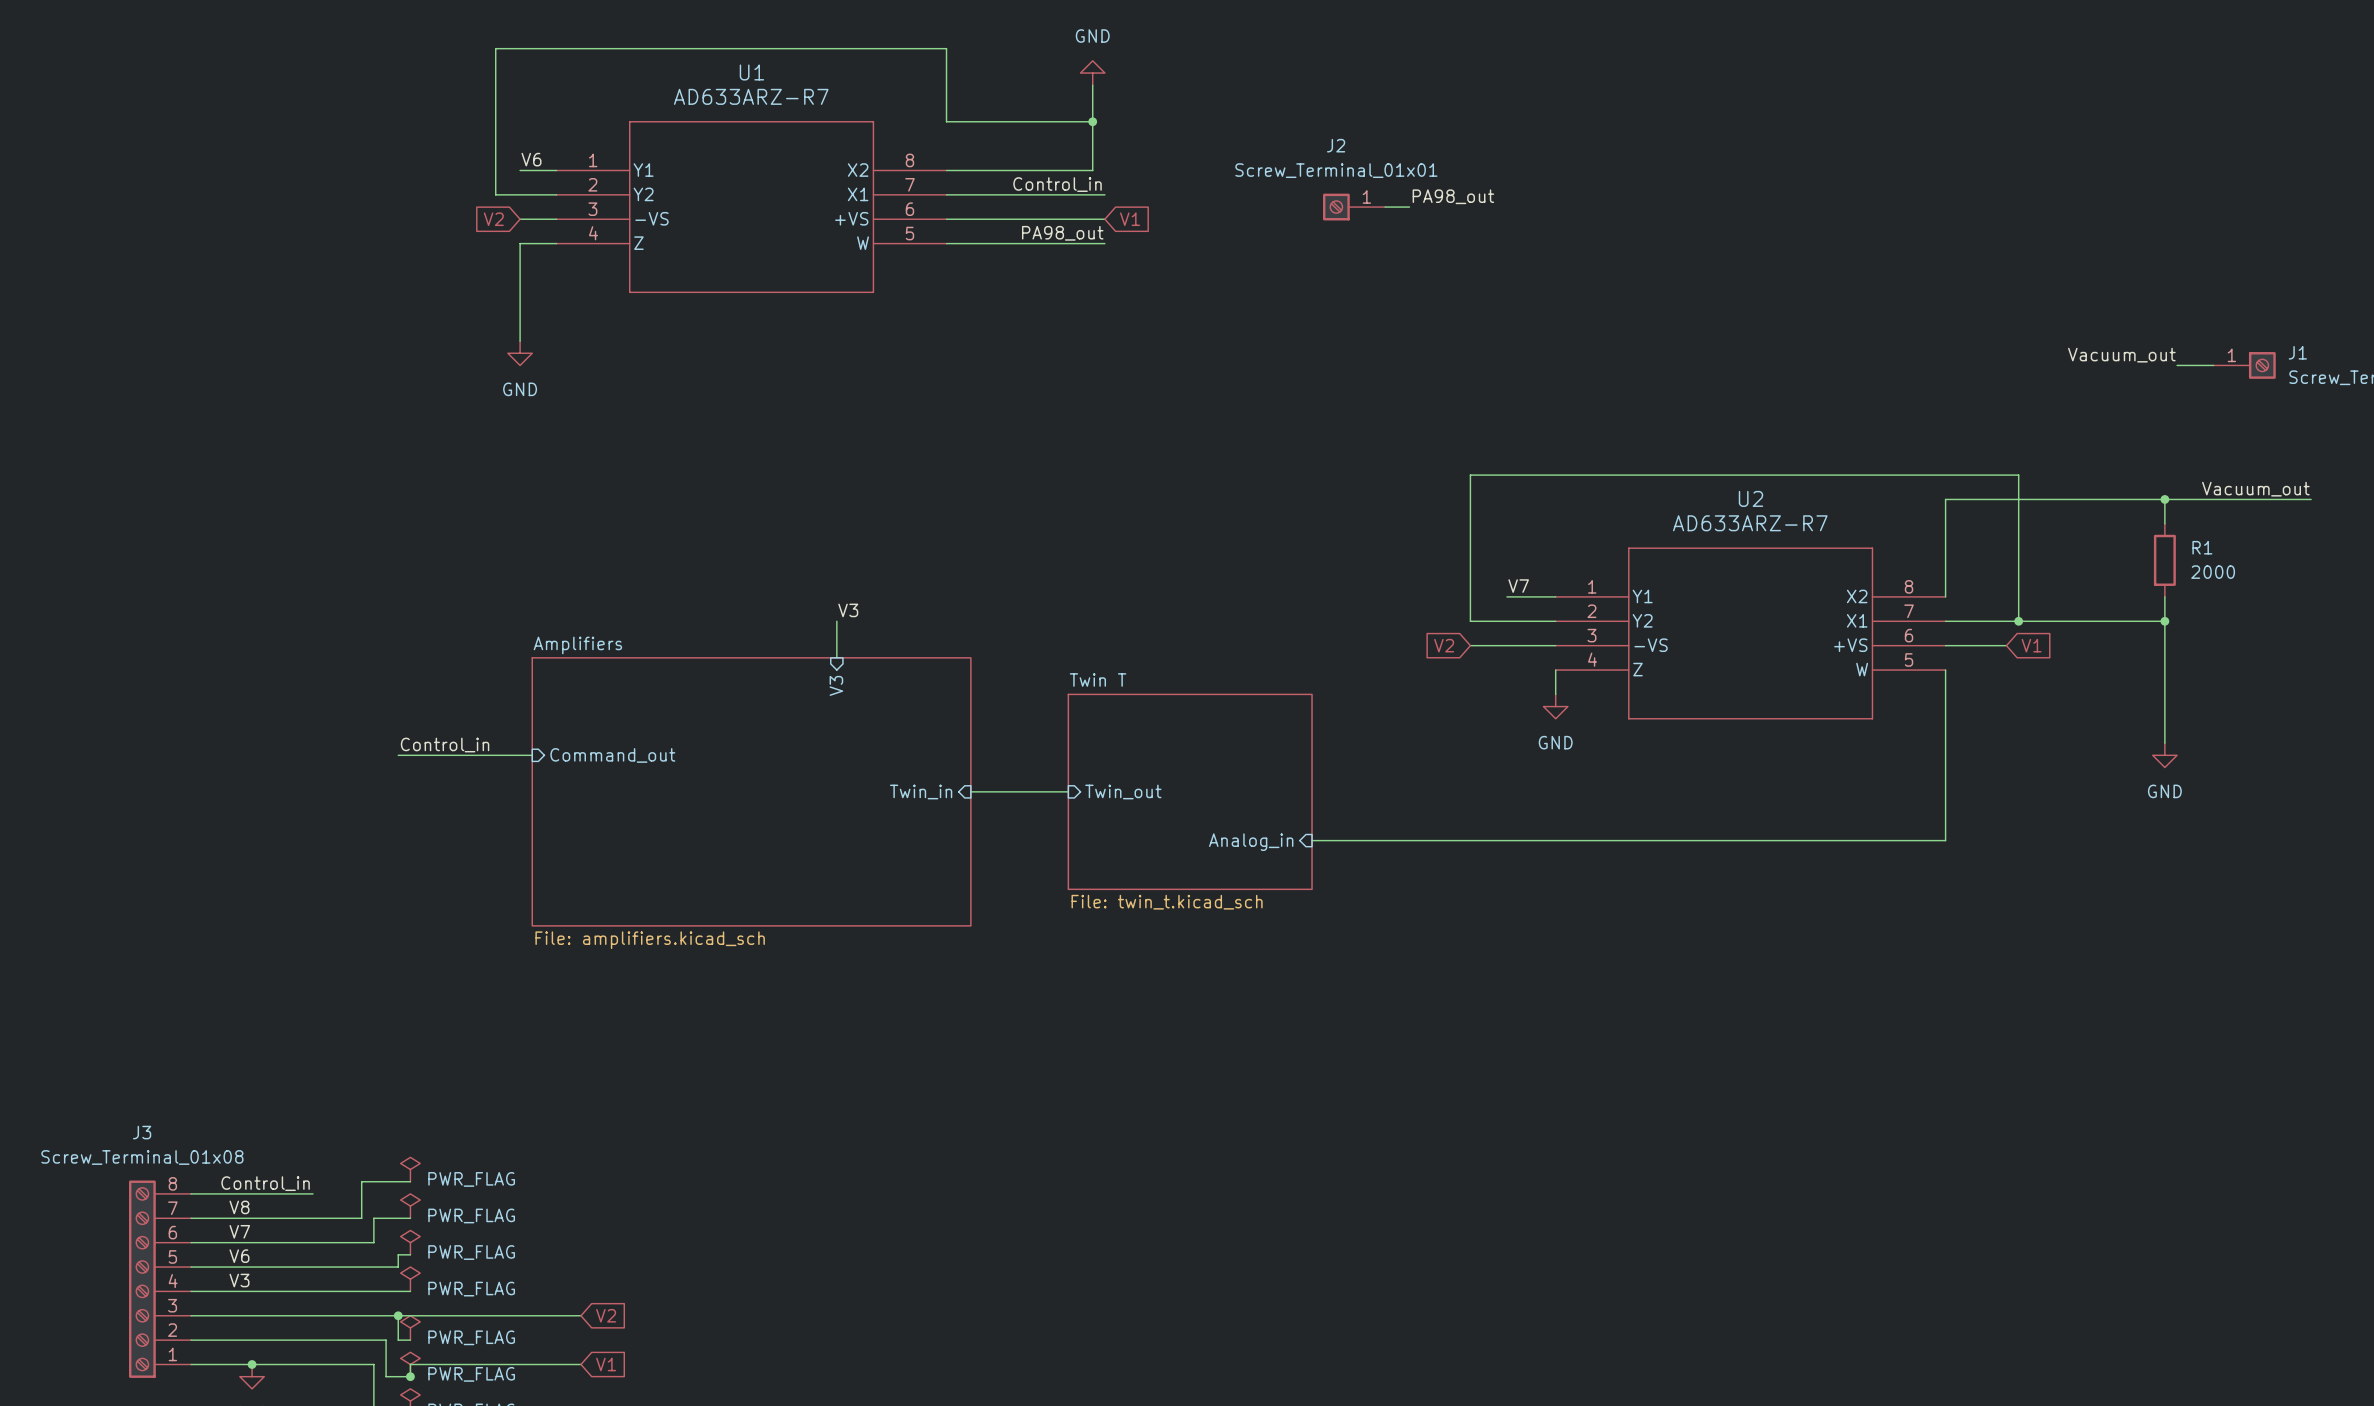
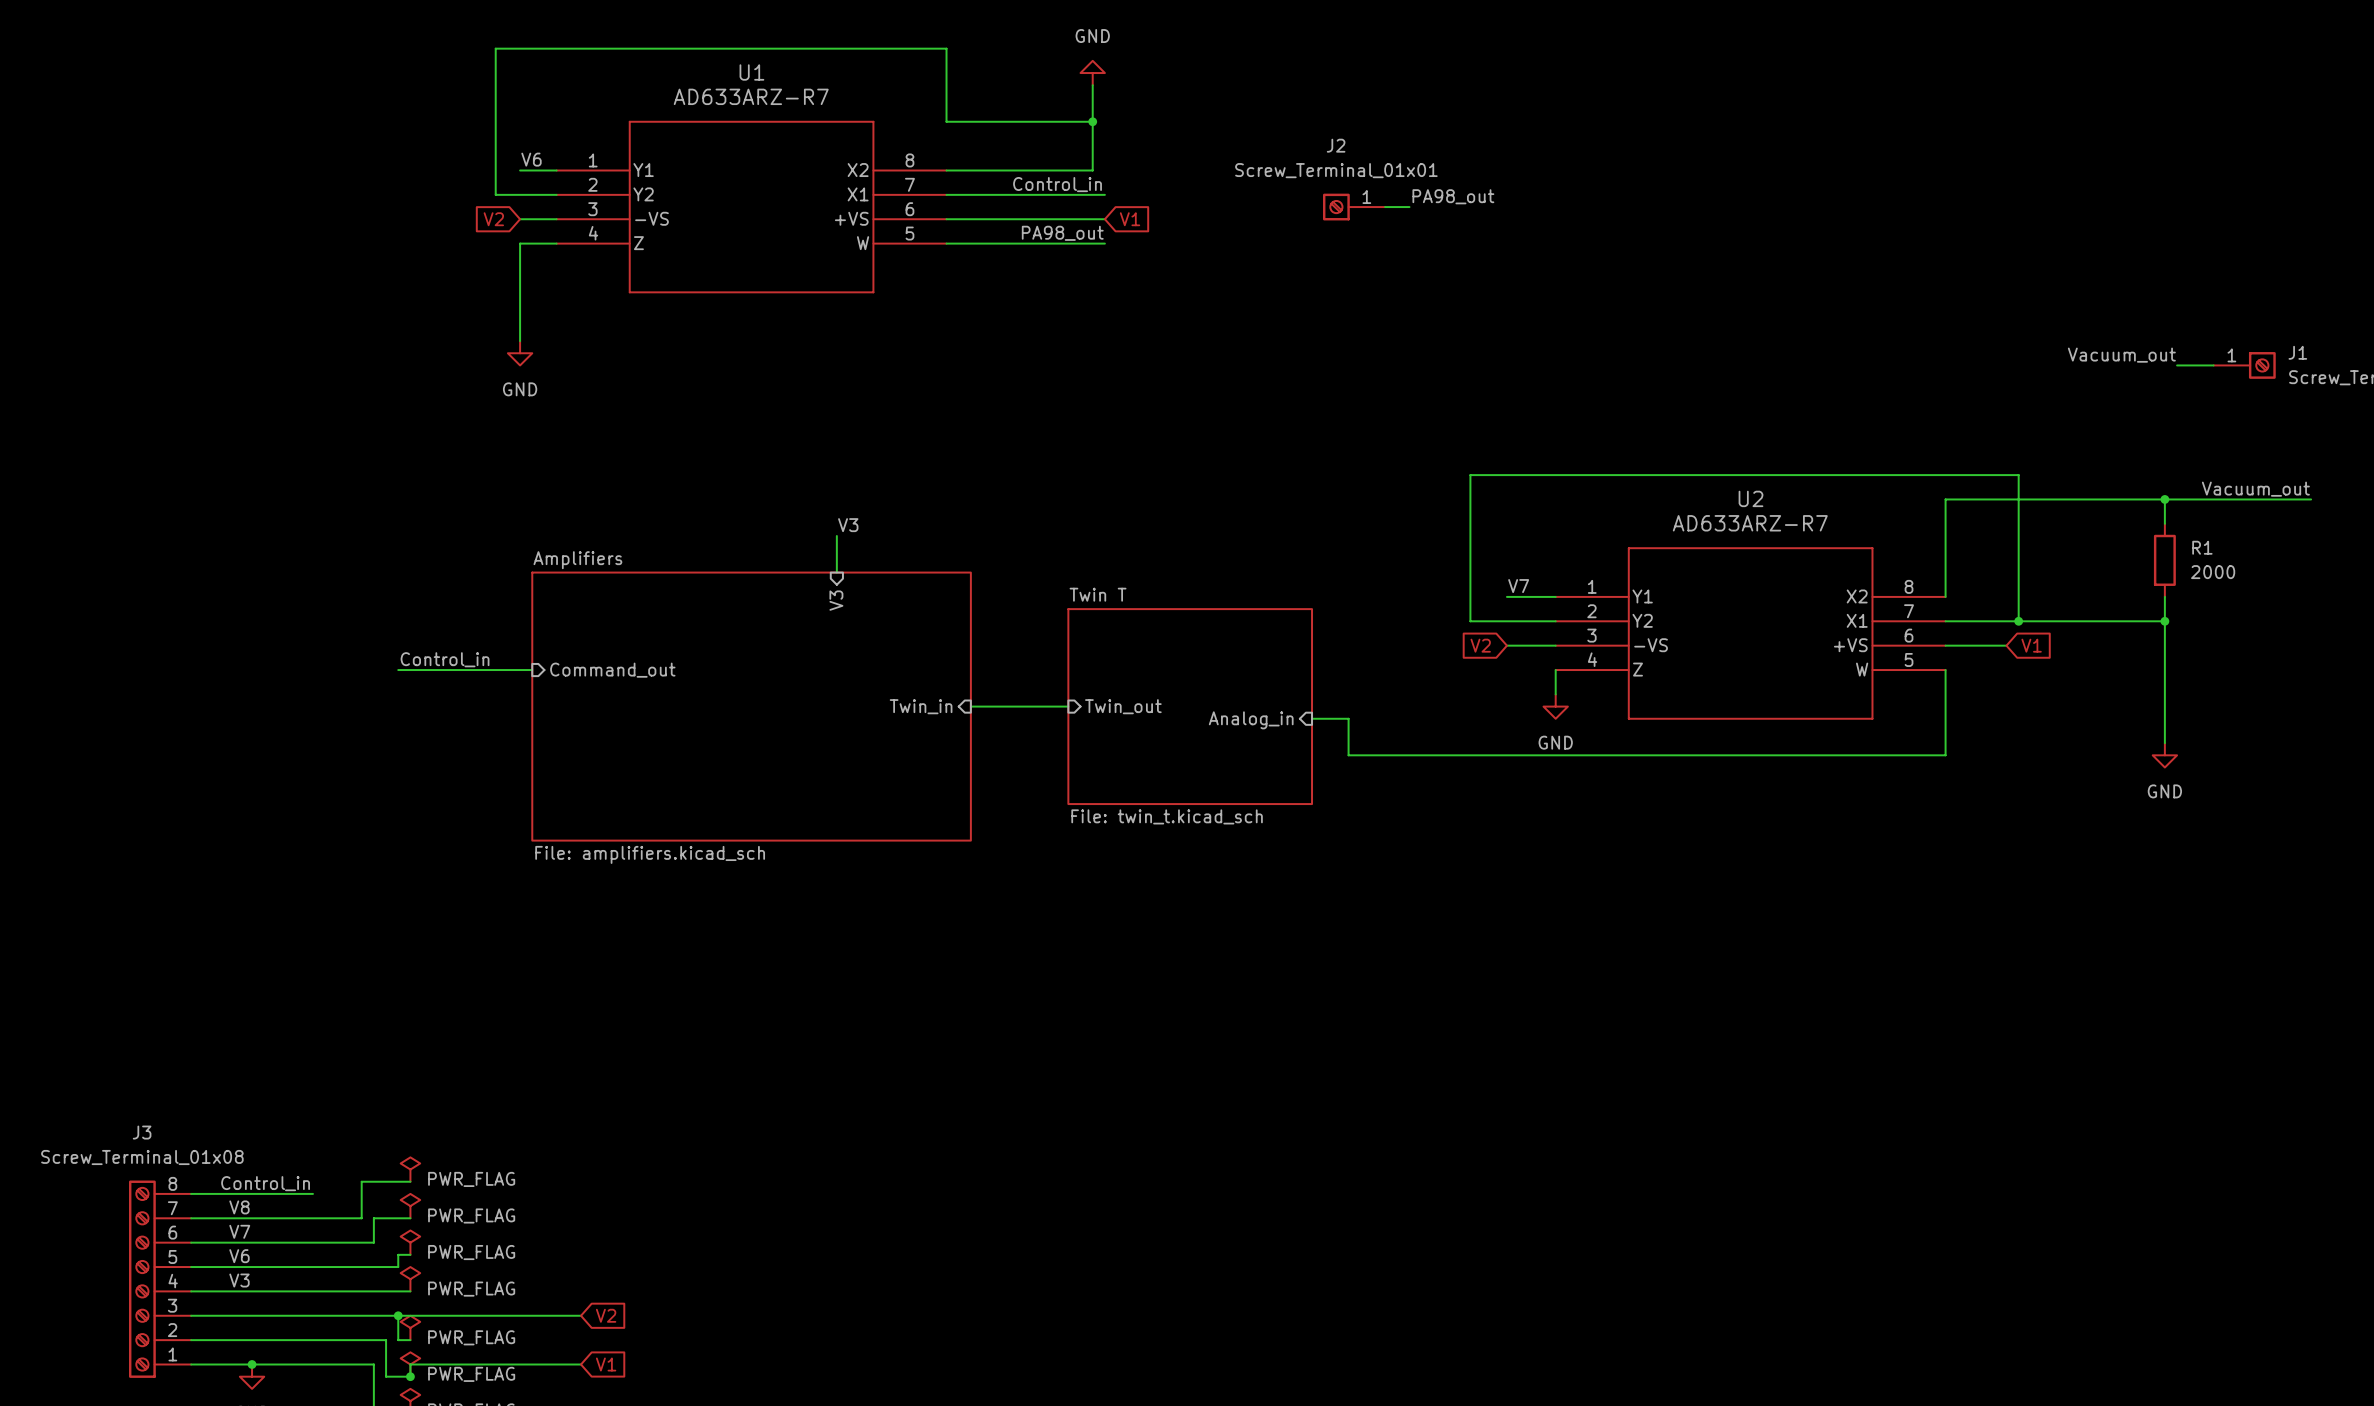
label position: V3 (848, 610) -> V3 (848, 525)
wire: (836, 621) (836, 657) -> (836, 536) (836, 572)
global label position: V2 (1444, 645) -> V2 (1480, 645)
wire: (1470, 645) (1506, 645) -> none
sheet pin position: V3 (836, 685) -> V3 (836, 600)
label position: Control_in (445, 745) -> Control_in (445, 659)
wire: (398, 755) (532, 755) -> (398, 670) (532, 670)
sheet pin position: Command_out (612, 755) -> Command_out (612, 670)
wire: (1945, 755) (1945, 840) (1312, 840) -> (1945, 755) (1348, 755) (1348, 718) (1312, 718)
sheet Amplifiers position: (751, 791) -> (751, 706)
sheet pin position: Twin_in (921, 791) -> Twin_in (921, 706)
wire: (970, 791) (1068, 791) -> (970, 706) (1068, 706)
sheet pin position: Twin_out (1123, 791) -> Twin_out (1123, 706)
sheet Twin T position: (1190, 791) -> (1190, 706)
sheet pin position: Analog_in (1251, 842) -> Analog_in (1251, 720)

